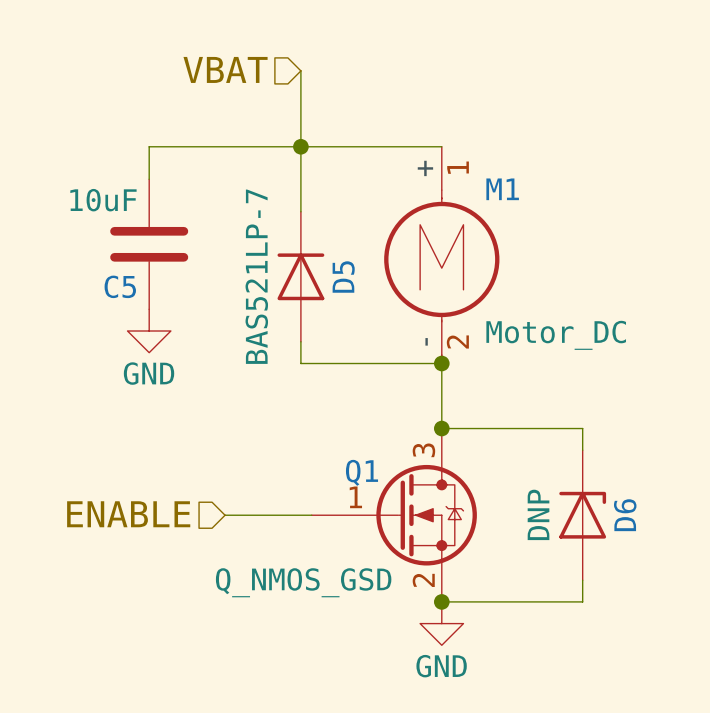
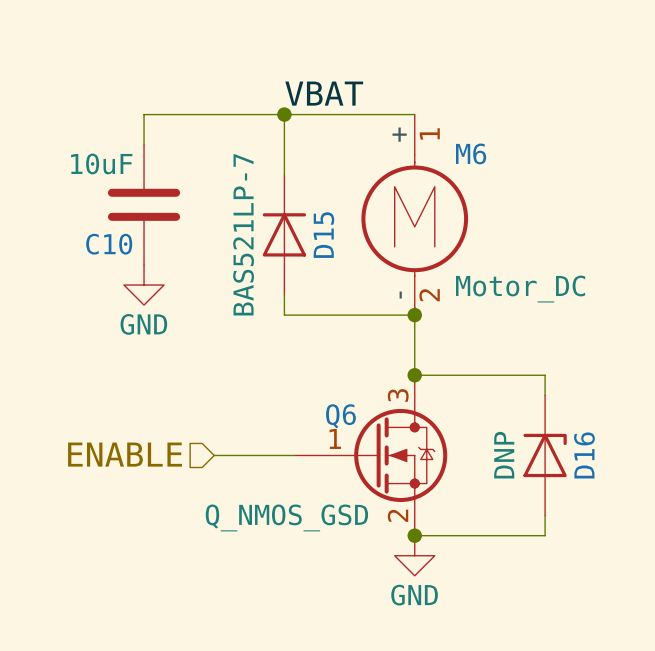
hierarchical label: VBAT (225, 69) -> none
wire: (300, 70) (300, 146) -> none
label: none -> VBAT (324, 93)
M1 name: M1 (502, 189) -> M6 (471, 153)
D5 name: D5 (343, 277) -> D15 (323, 235)
C5 name: C5 (120, 286) -> C10 (109, 244)
Q1 name: Q1 (362, 472) -> Q6 (340, 416)
D6 name: D6 (625, 515) -> D16 (584, 455)

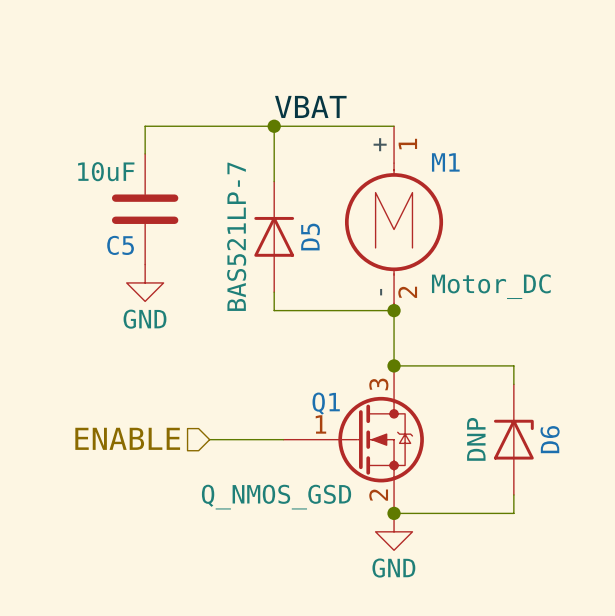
M6 name: M6 (471, 153) -> M1 (445, 162)
D15 name: D15 (323, 235) -> D5 (310, 237)
C10 name: C10 (109, 244) -> C5 (120, 245)
Q6 name: Q6 (340, 416) -> Q1 (326, 403)
D16 name: D16 (584, 455) -> D6 (550, 439)

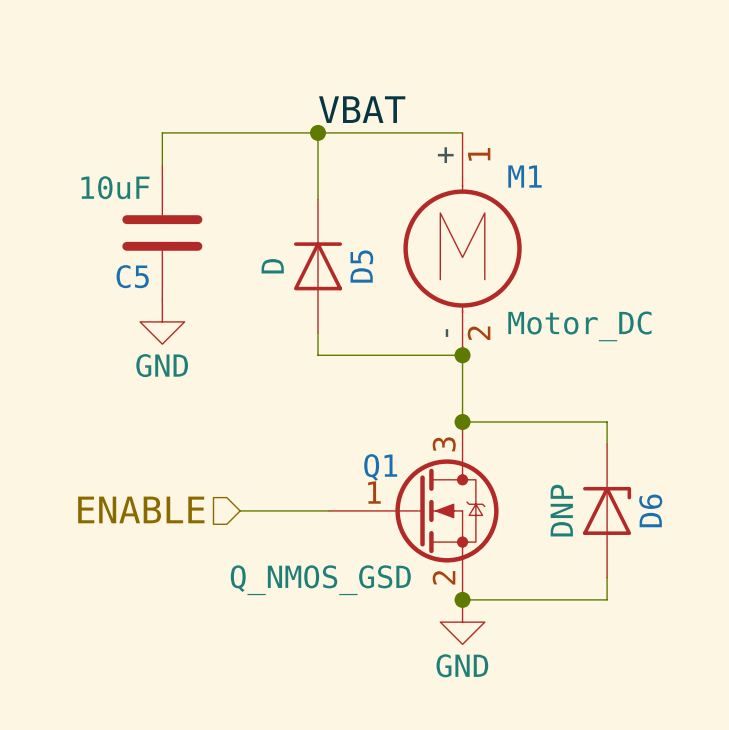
D5 value: BAS521LP-7 (236, 236) -> D (272, 266)

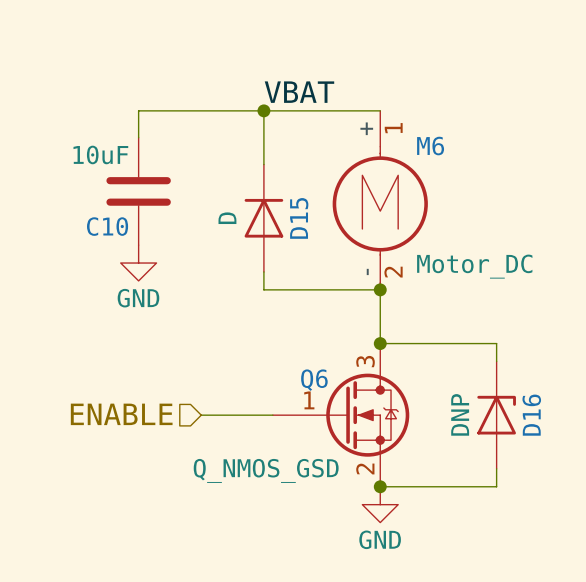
M1 name: M1 (524, 176) -> M6 (430, 146)
D5 name: D5 (361, 266) -> D15 (299, 218)
C5 name: C5 (132, 276) -> C10 (107, 226)
Q1 name: Q1 (380, 467) -> Q6 (314, 380)
D6 name: D6 (650, 510) -> D16 (531, 415)

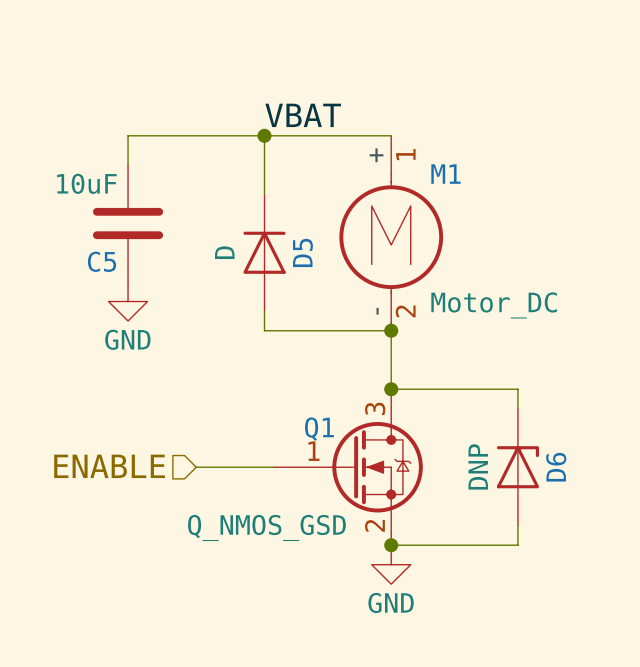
M6 name: M6 (430, 146) -> M1 (445, 174)
D15 name: D15 (299, 218) -> D5 (302, 252)
C10 name: C10 (107, 226) -> C5 (102, 261)
Q6 name: Q6 (314, 380) -> Q1 (319, 429)
D16 name: D16 (531, 415) -> D6 (556, 467)

